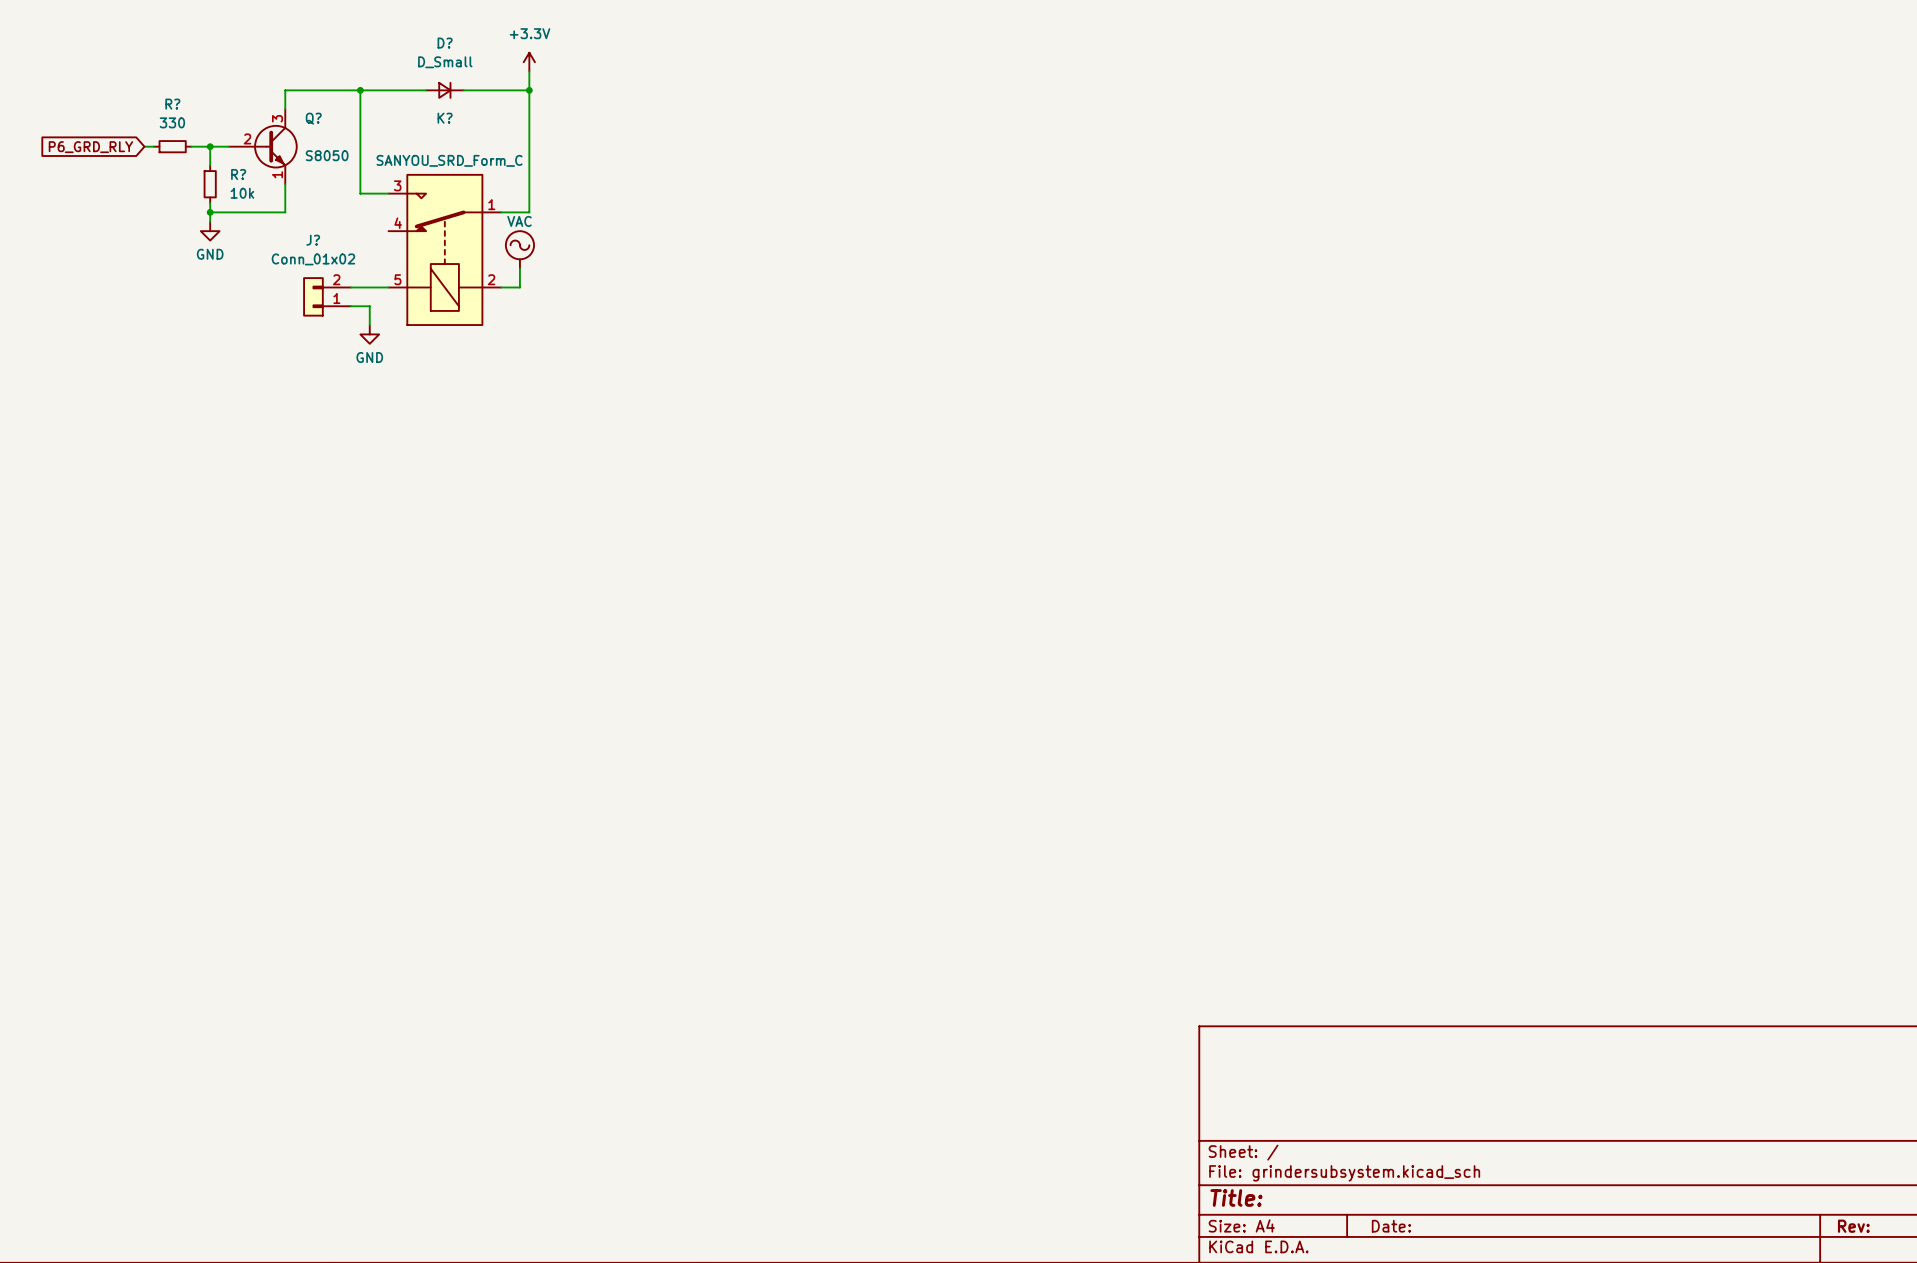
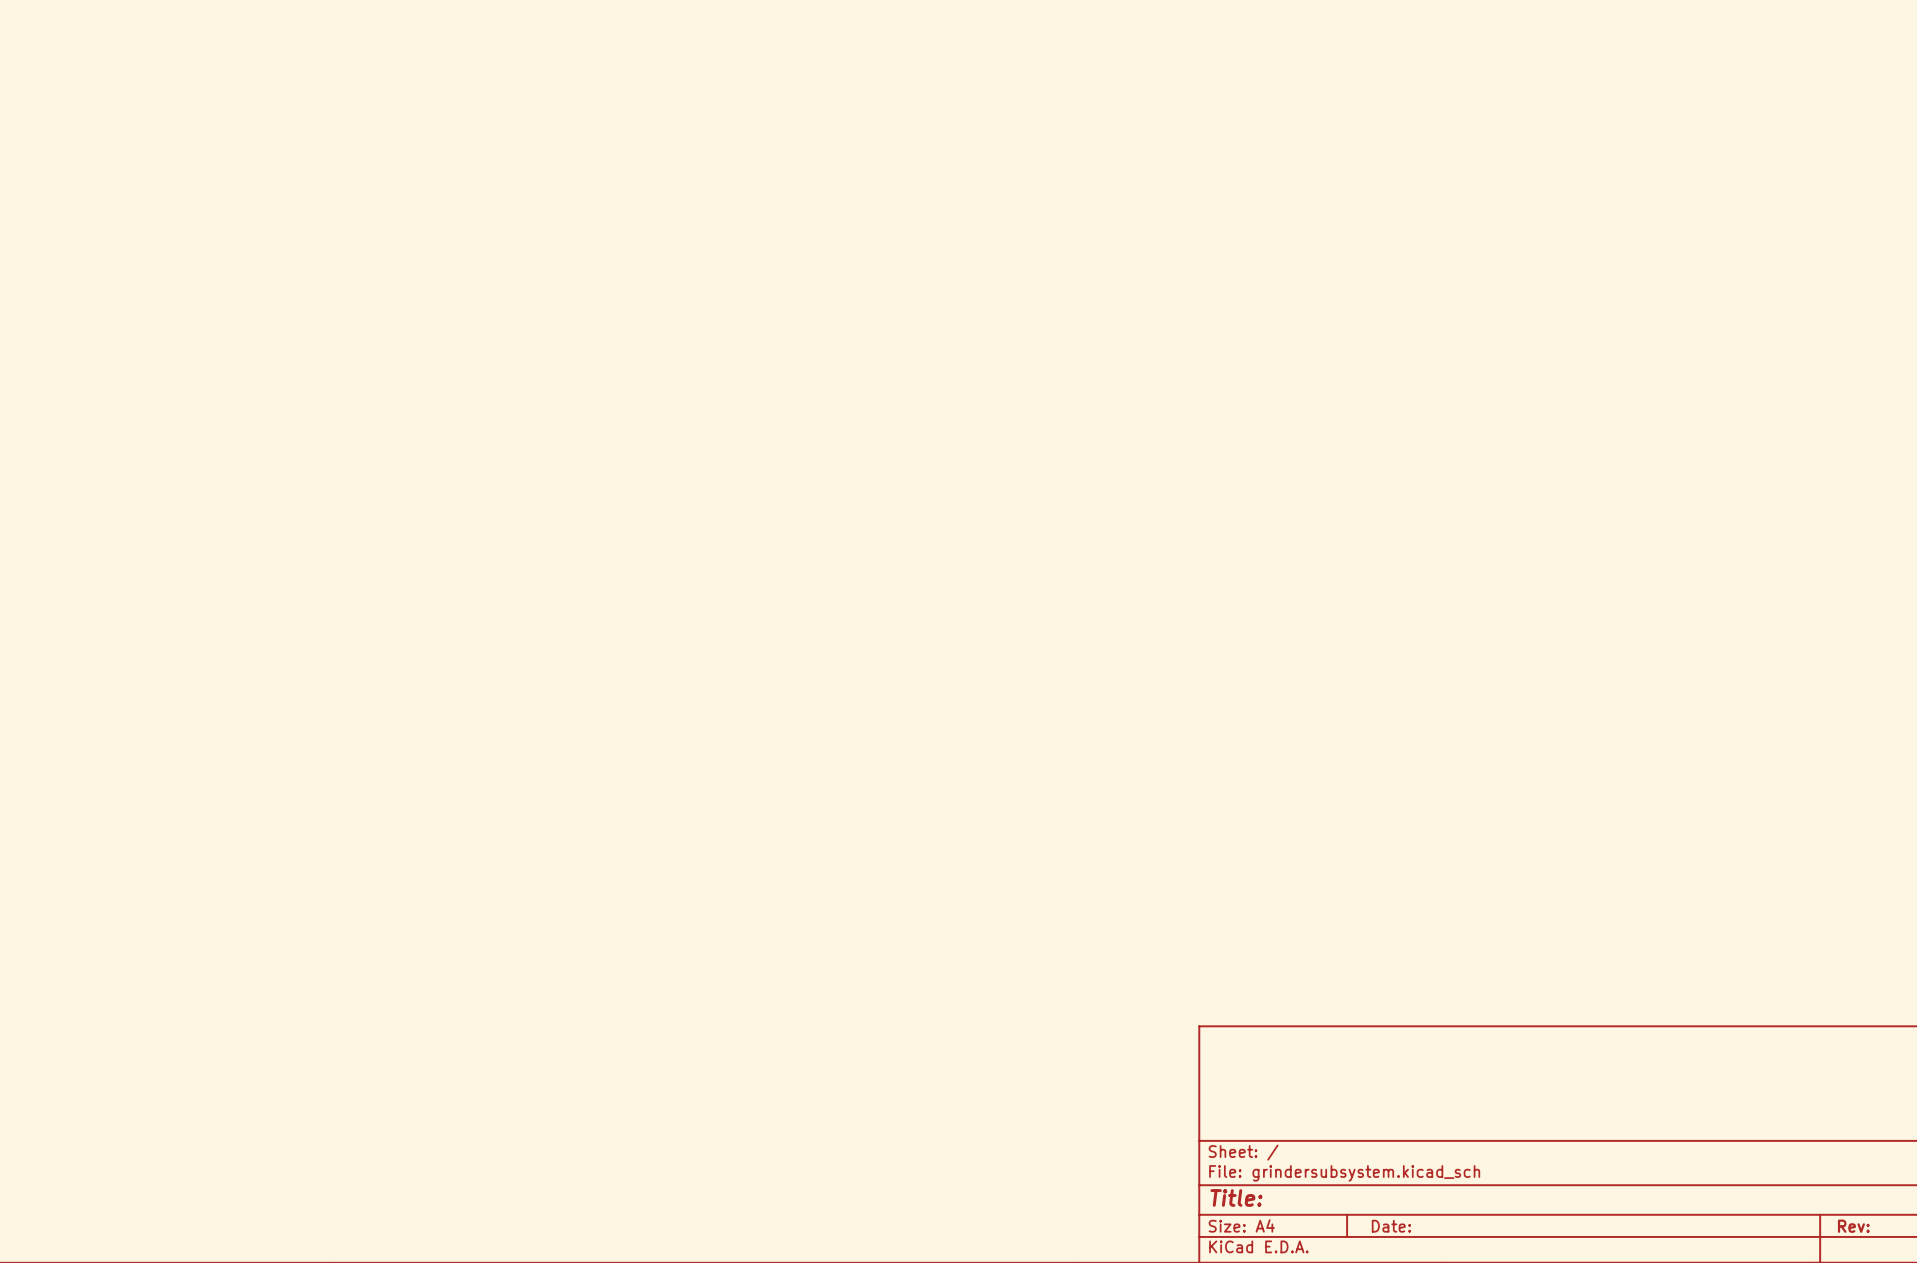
power symbol: +3.3V (529, 62) -> none
wire: (529, 71) (529, 212) (501, 212) -> none
wire: (360, 90) (360, 193) (388, 193) -> none
junction: (360, 90) -> none
wire: (426, 90) (285, 90) (285, 109) -> none
D?: D_Small (444, 90) -> none
wire: (463, 90) (529, 90) -> none
junction: (529, 90) -> none
wire: (144, 146) (153, 146) -> none
R?: 330 (172, 146) -> none
wire: (191, 146) (228, 146) -> none
wire: (210, 146) (210, 165) -> none
junction: (210, 146) -> none
Q?: S8050 (263, 146) -> none
global label: P6_GRD_RLY (90, 147) -> none
R?: 10k (210, 184) -> none
wire: (285, 184) (285, 212) (210, 212) -> none
wire: (210, 203) (210, 221) -> none
junction: (210, 212) -> none
power symbol: GND (210, 231) -> none
K?: SANYOU_SRD_Form_C (444, 249) -> none
power symbol: VAC (519, 249) -> none
wire: (519, 268) (519, 287) (501, 287) -> none
wire: (350, 287) (388, 287) -> none
J?: Conn_01x02 (327, 296) -> none
wire: (350, 306) (369, 306) (369, 325) -> none
power symbol: GND (369, 334) -> none

